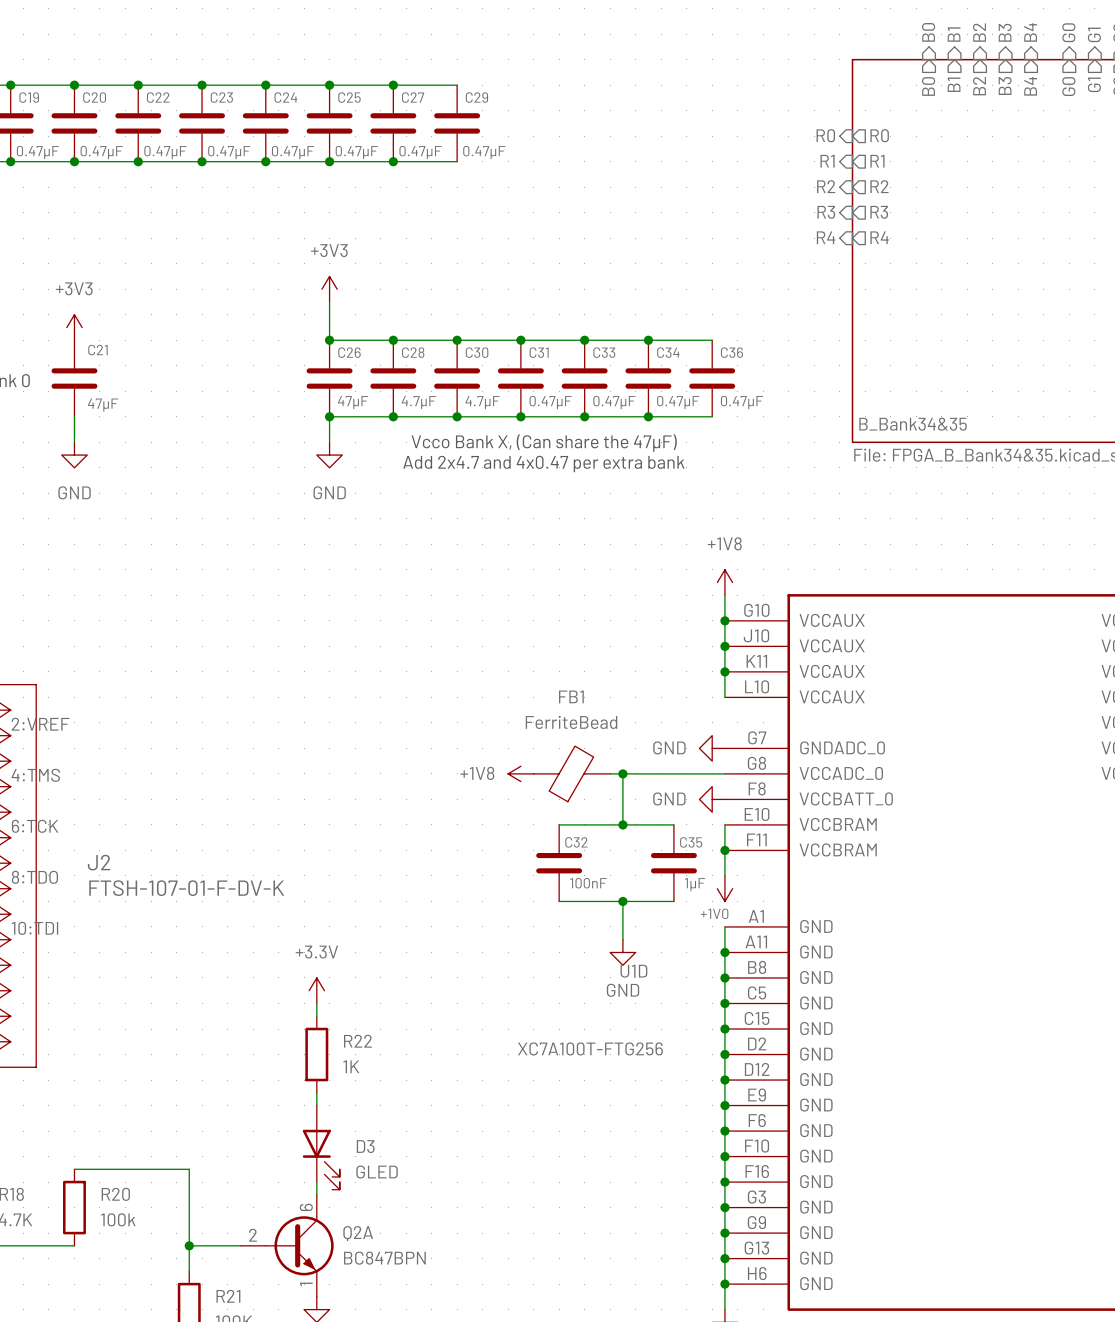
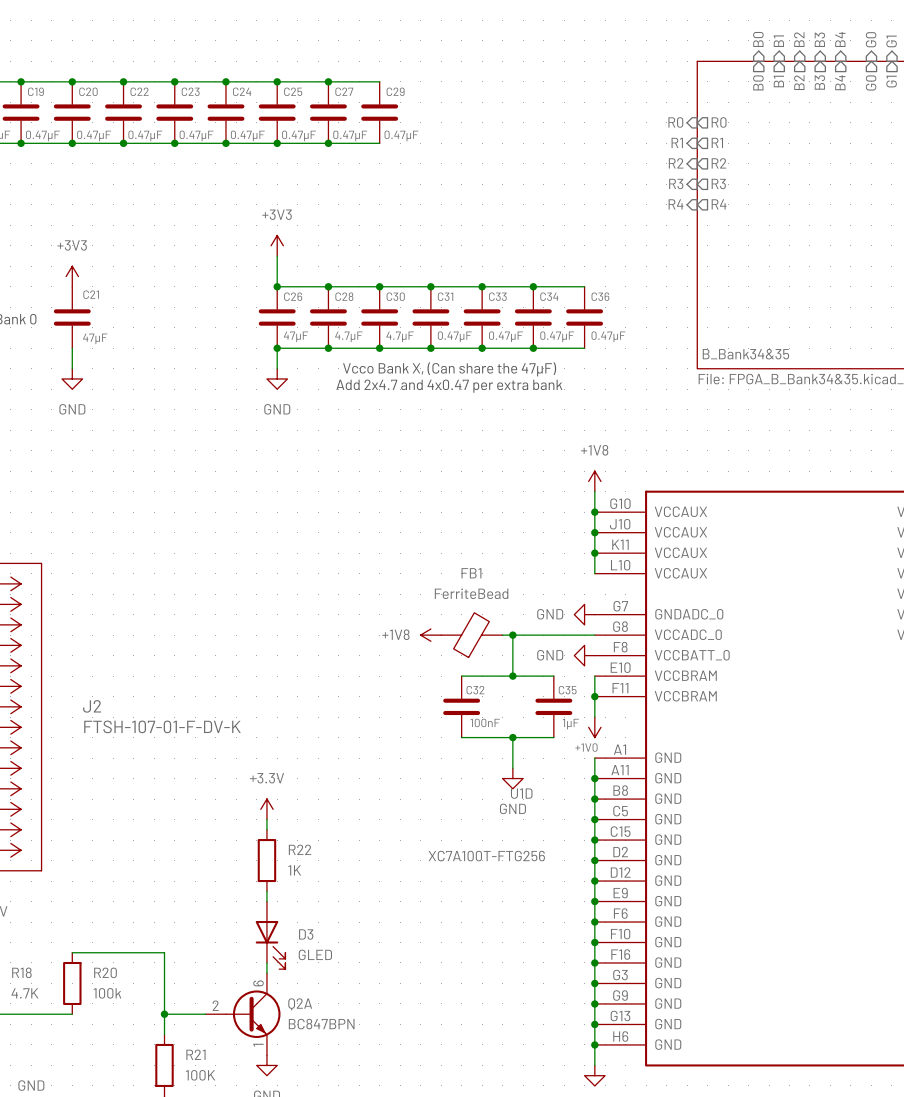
label: 2:VREF (40, 724) -> none
label: 4:TMS (35, 775) -> none
label: 6:TCK (35, 826) -> none
label: 8:TDO (34, 877) -> none
label: 10:TDI (34, 928) -> none

